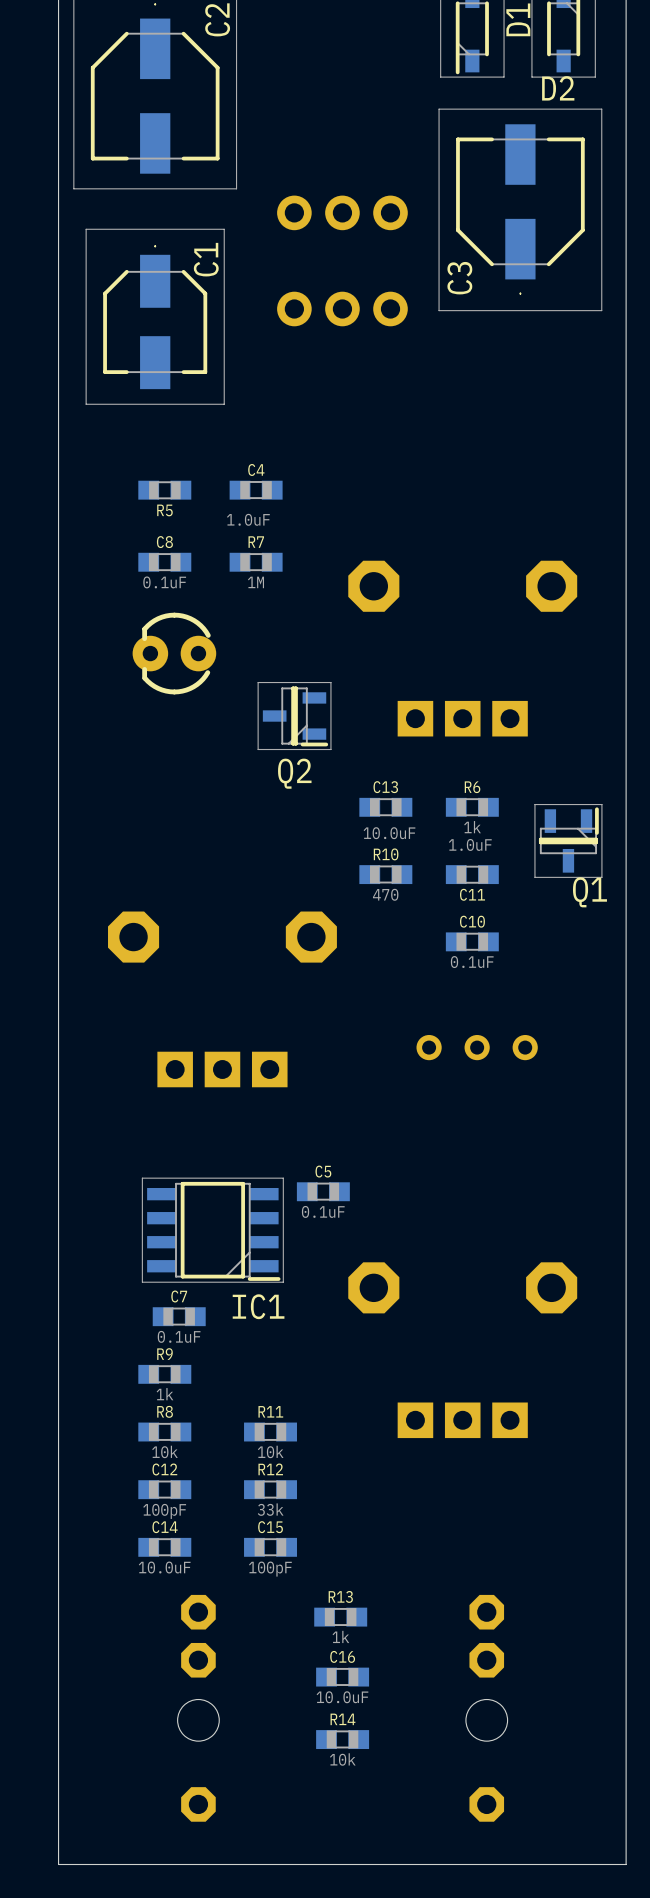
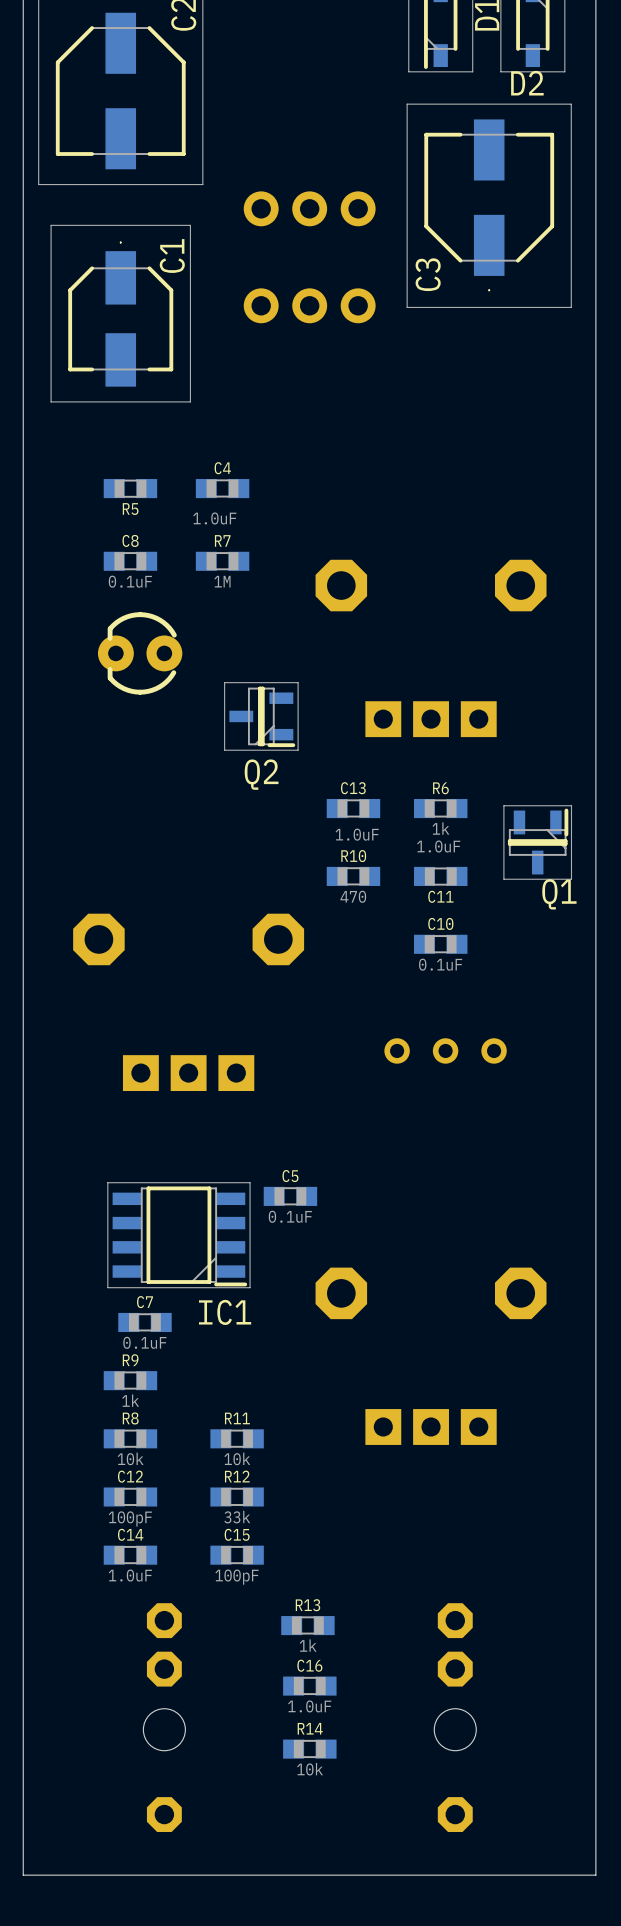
C13 value: 10.0uF (389, 833) -> 1.0uF (357, 834)
C14 value: 10.0uF (164, 1567) -> 1.0uF (130, 1575)
C16 value: 10.0uF (342, 1697) -> 1.0uF (309, 1706)

